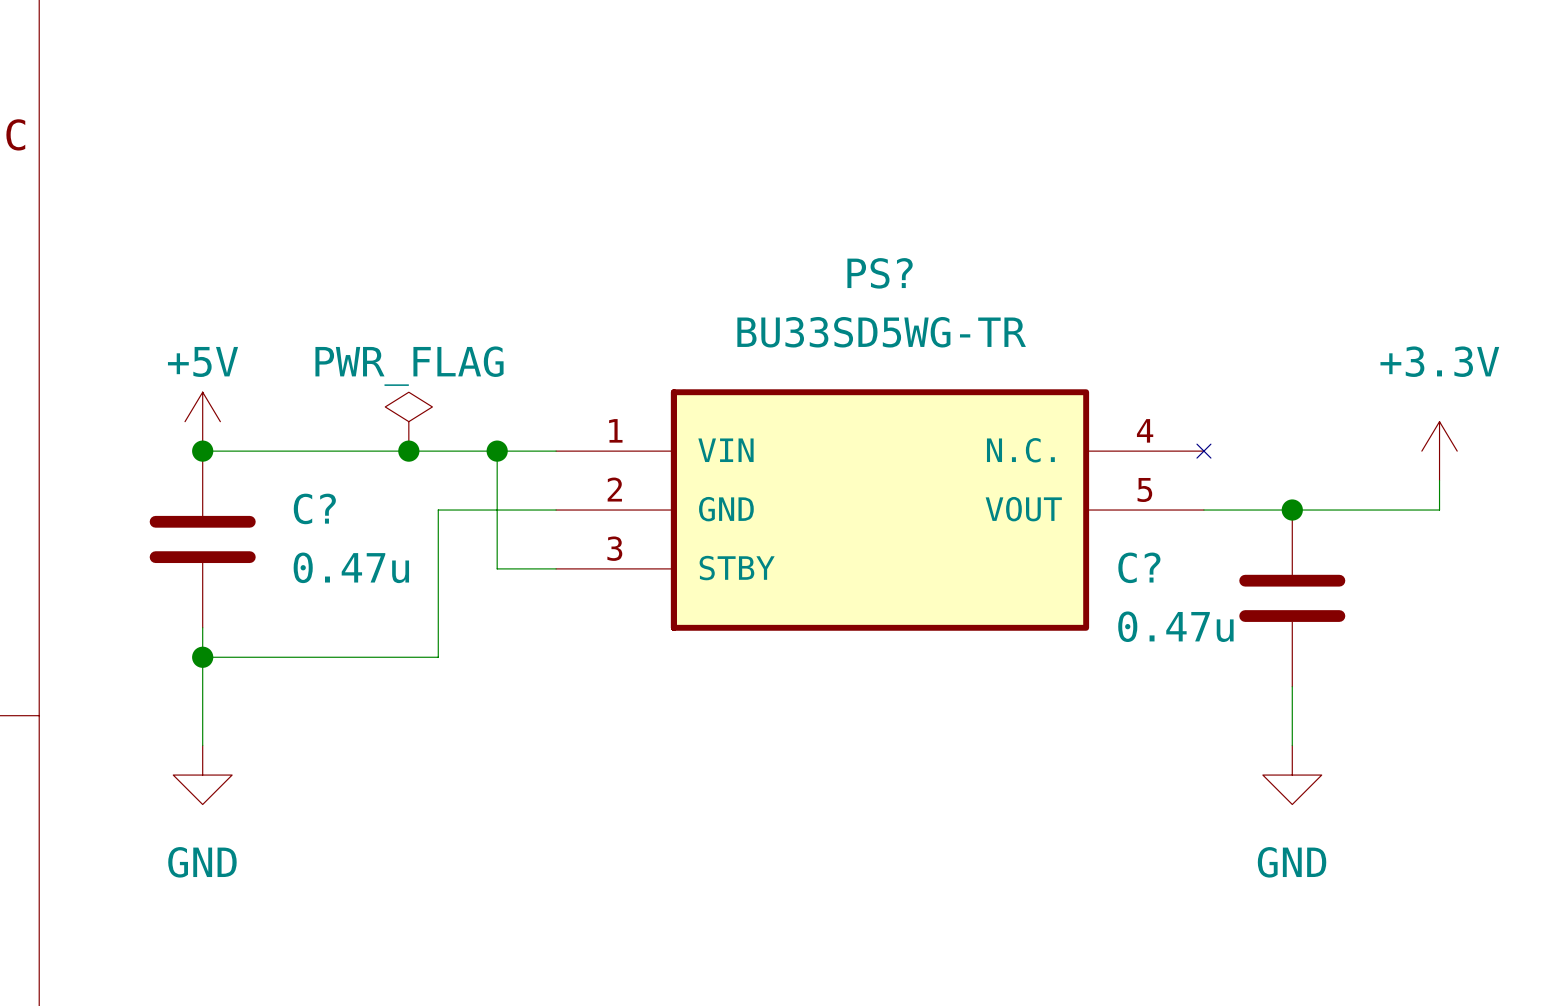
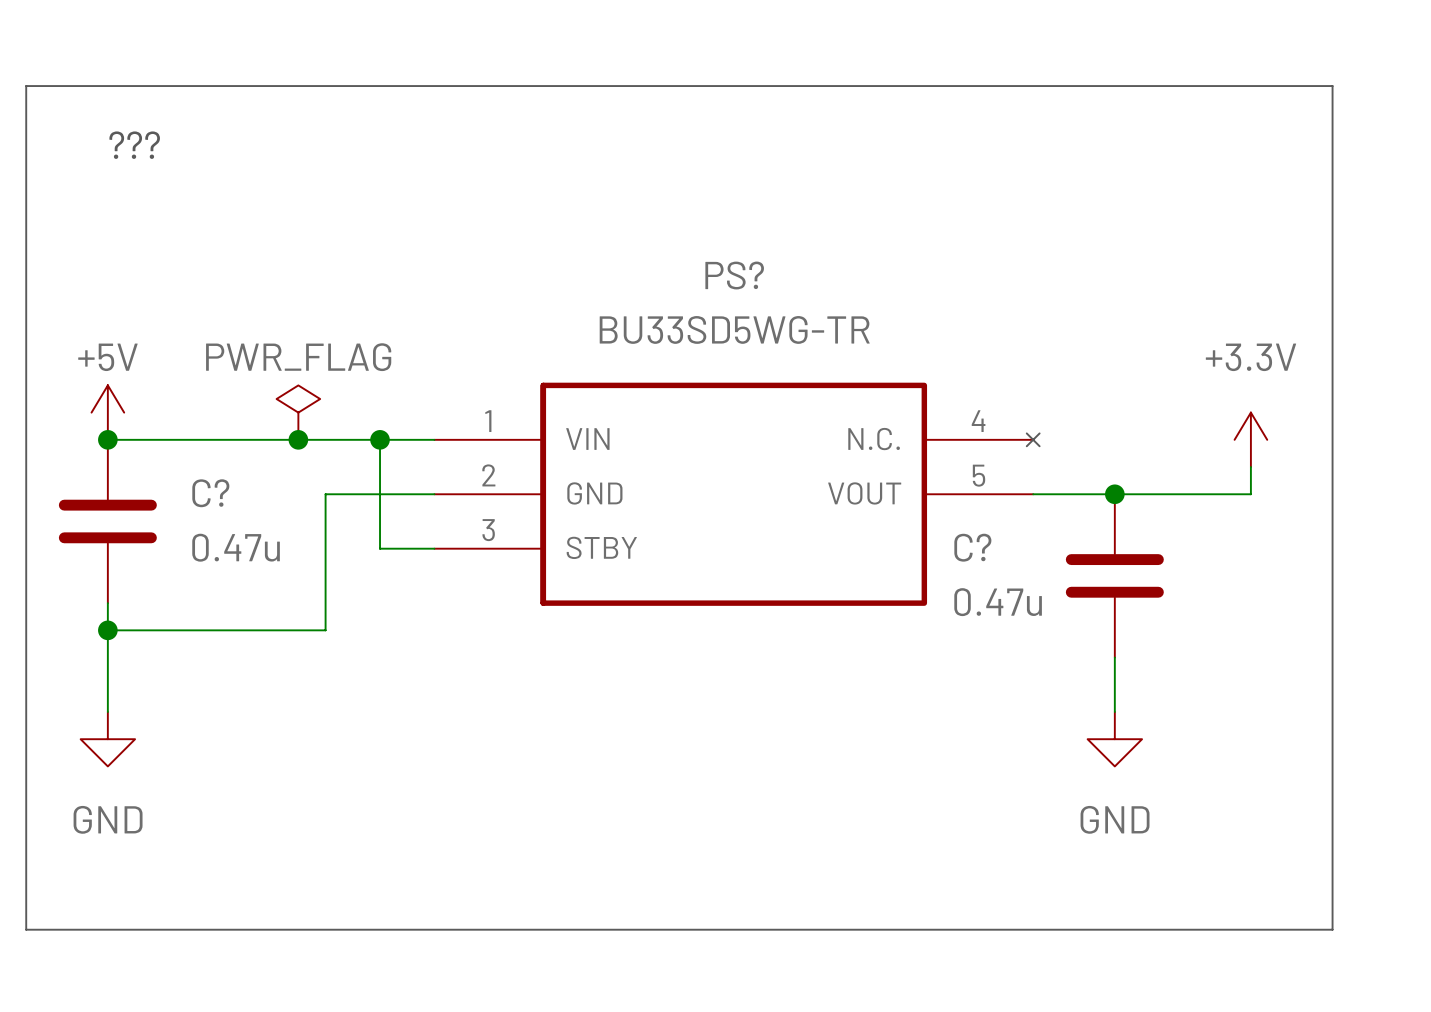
line: none -> (26, 86) (1332, 86) (1332, 929) (26, 929) (26, 86)
text: none -> ??? (134, 145)

